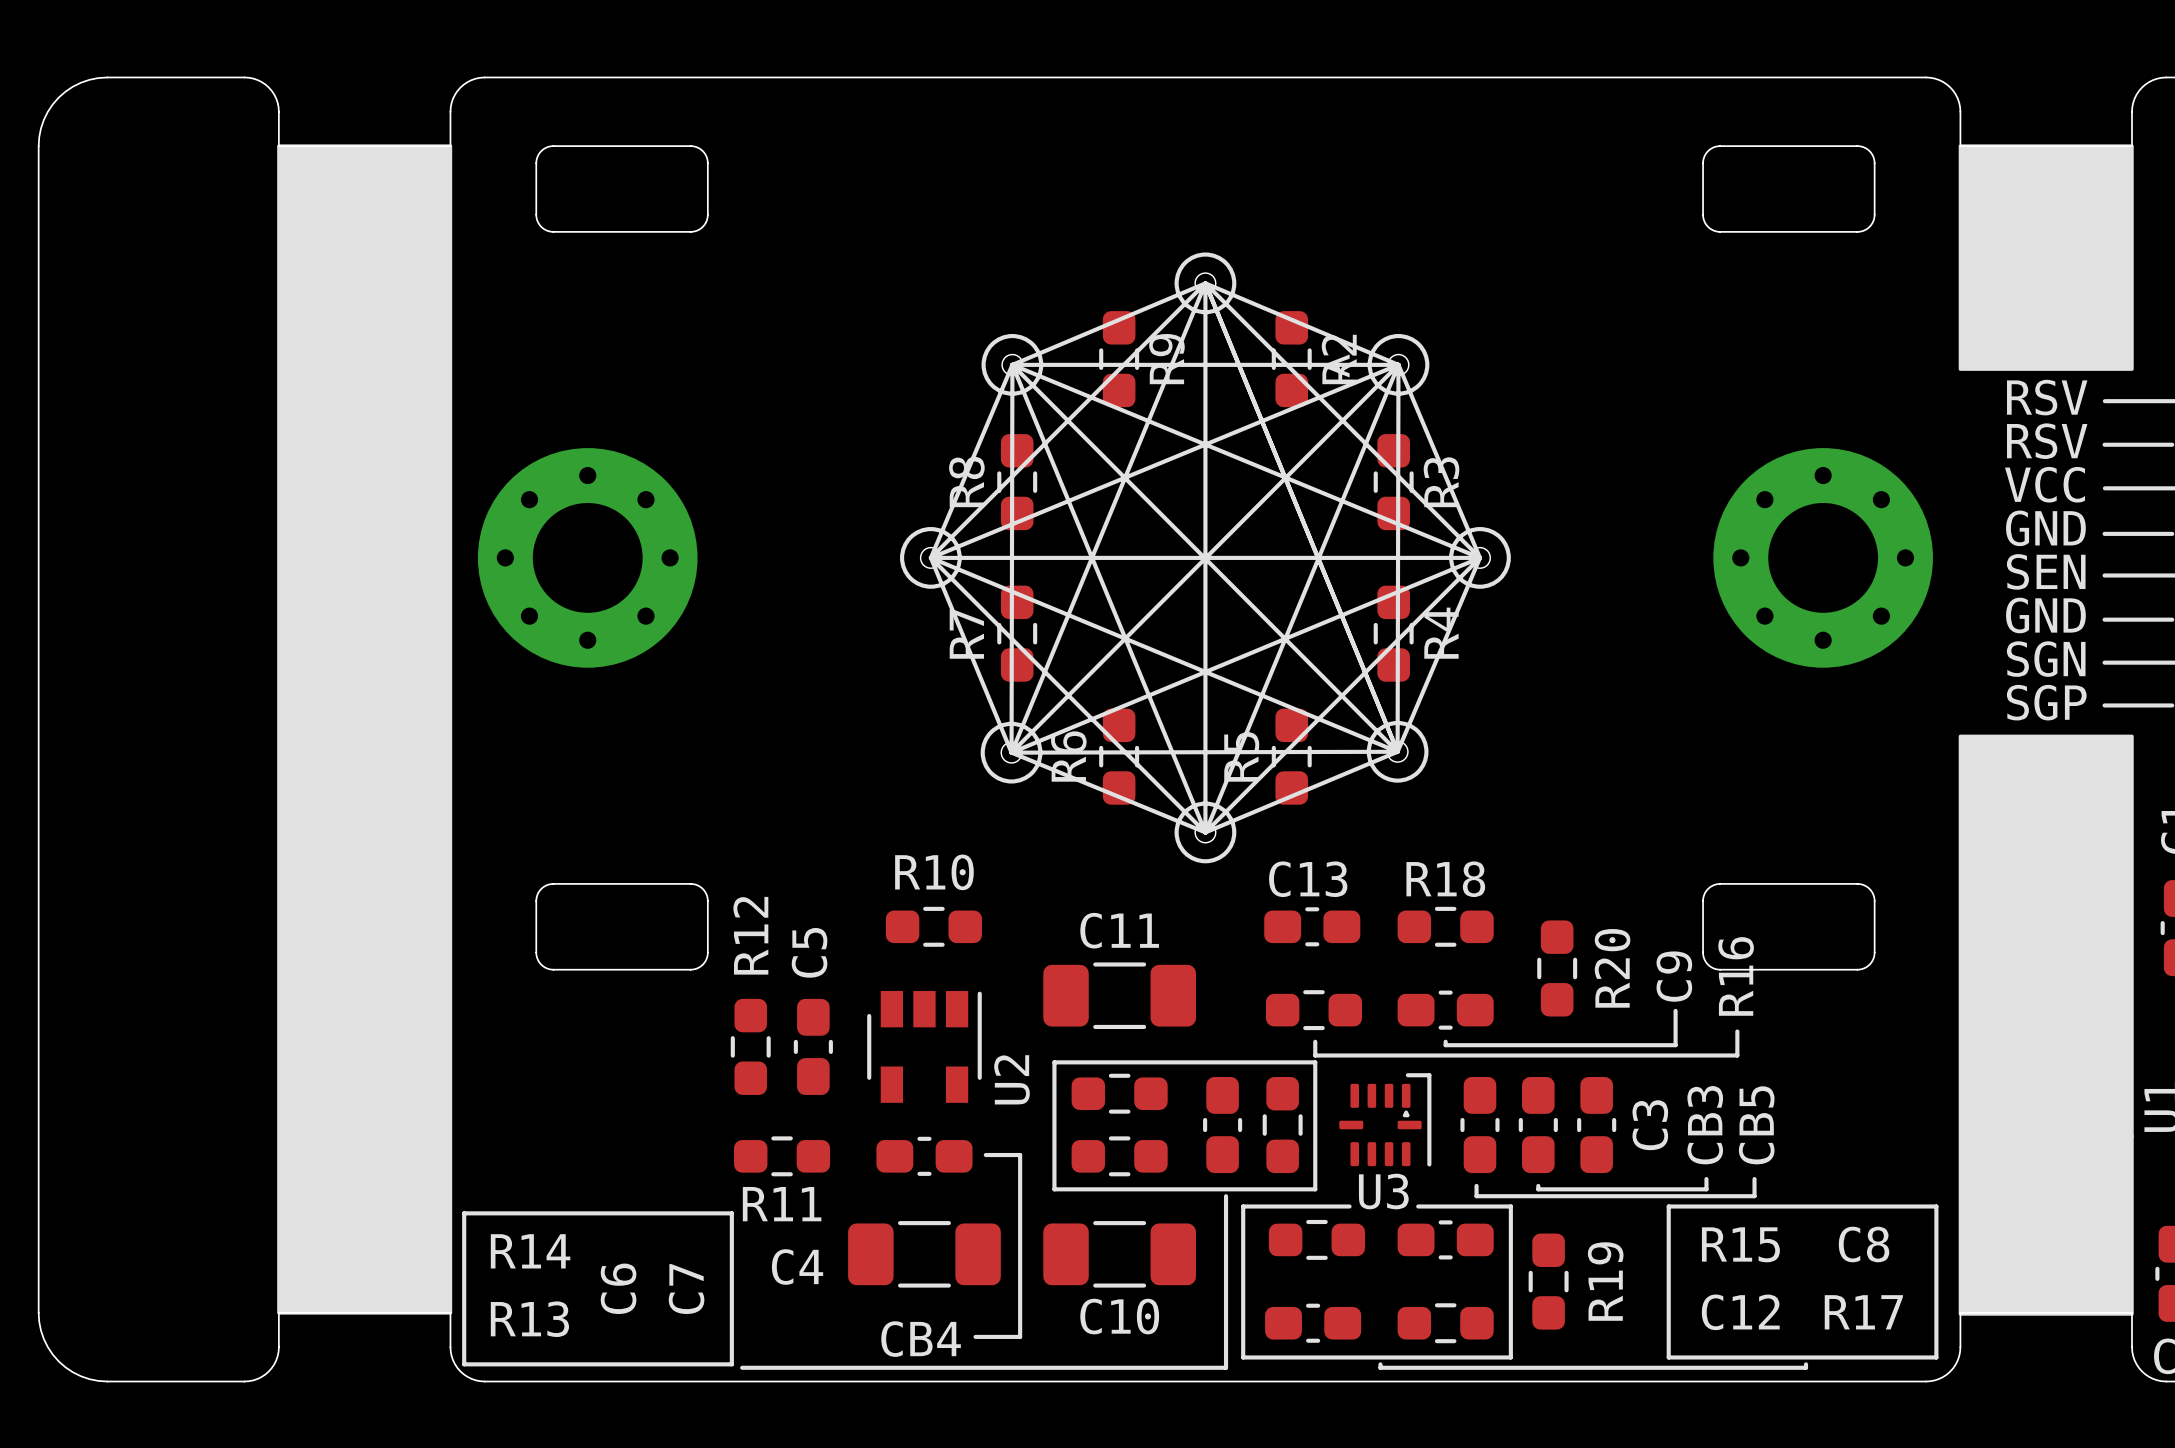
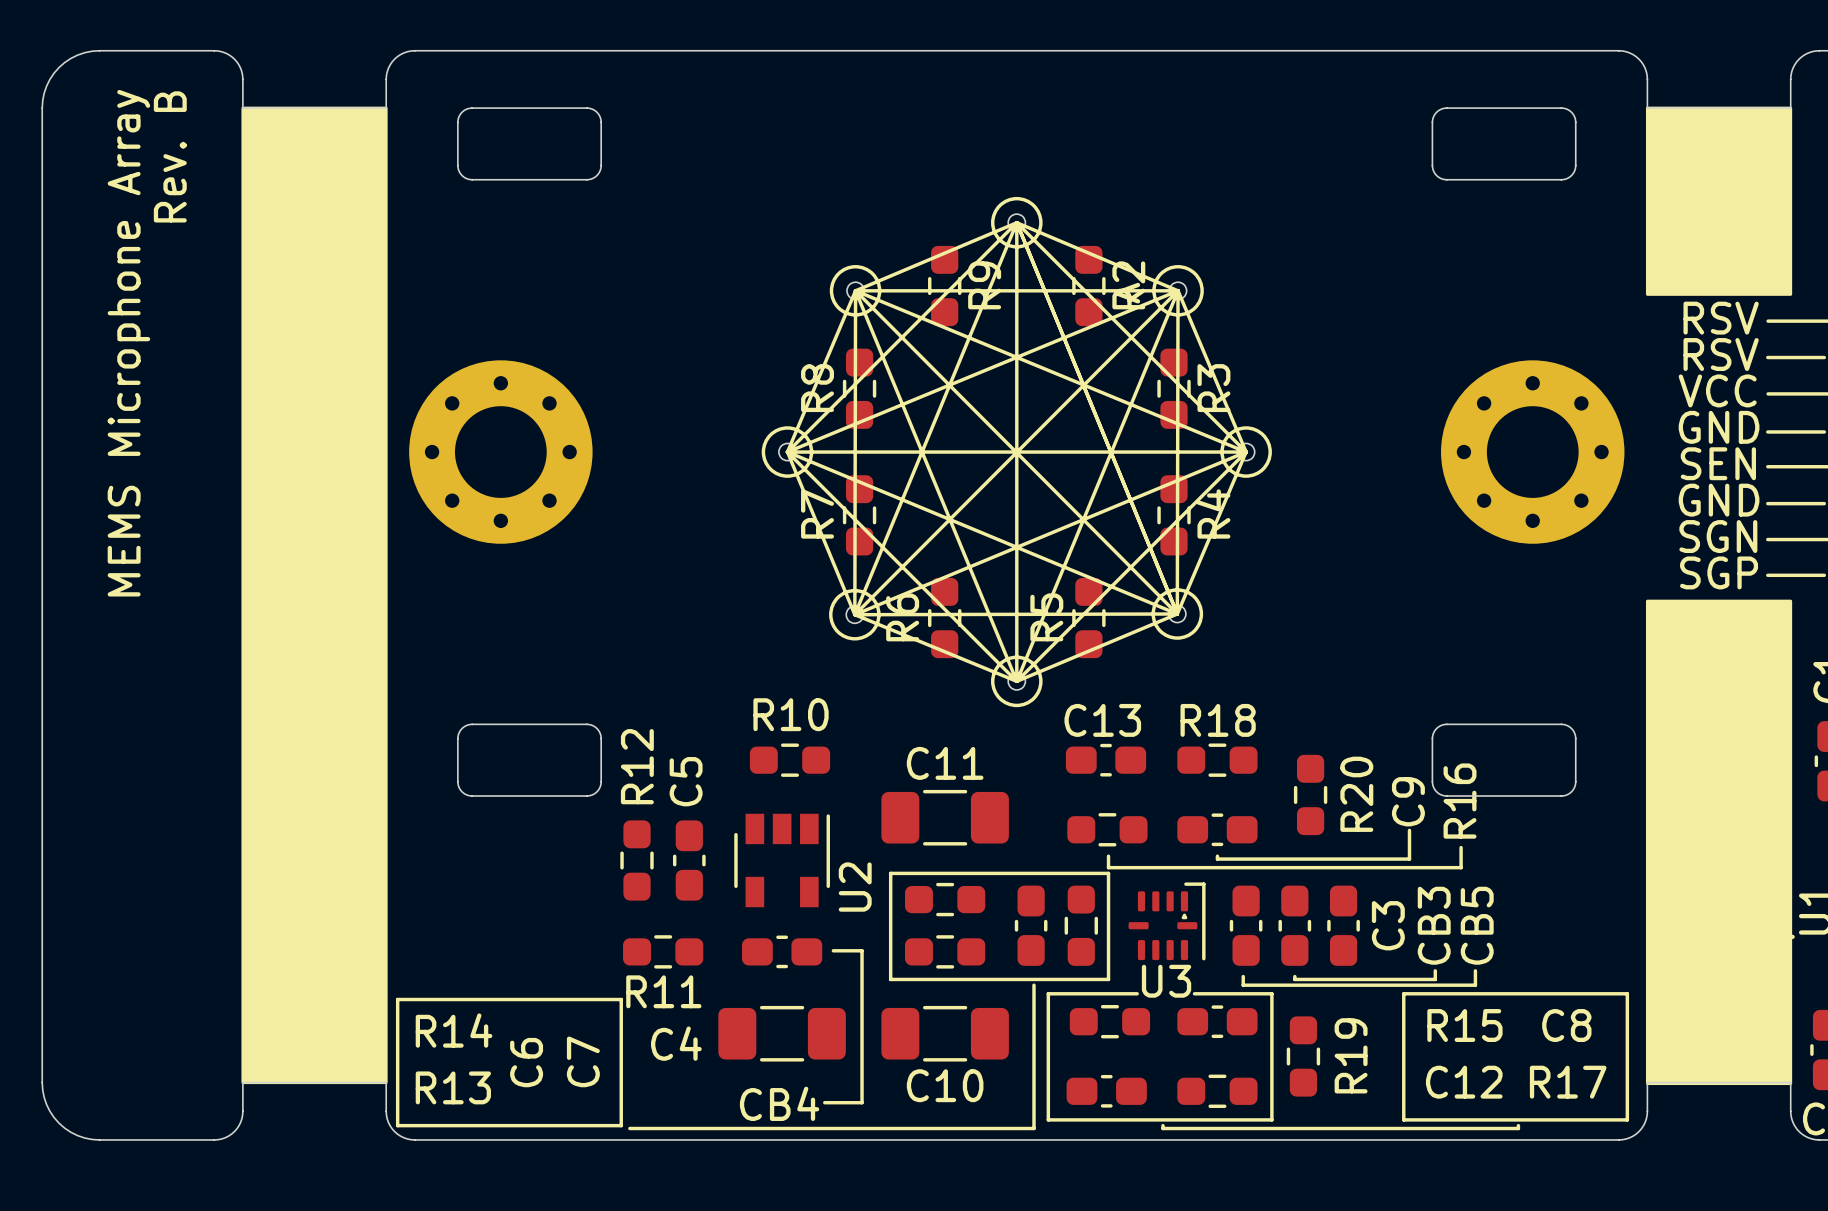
text: none -> Rev. B (170, 156)
text: none -> MEMS Microphone Array (128, 343)

